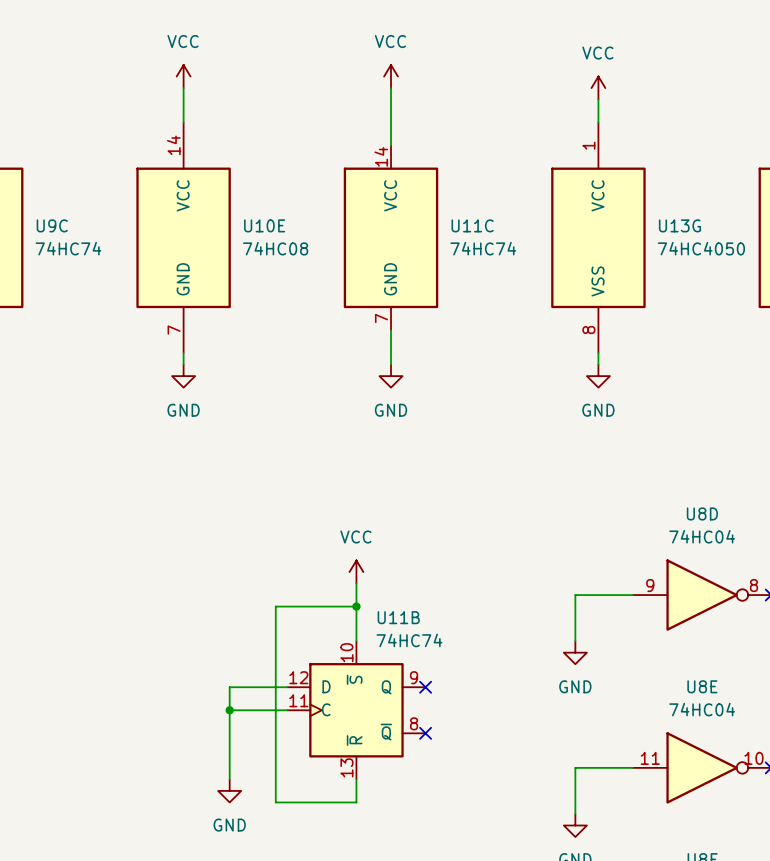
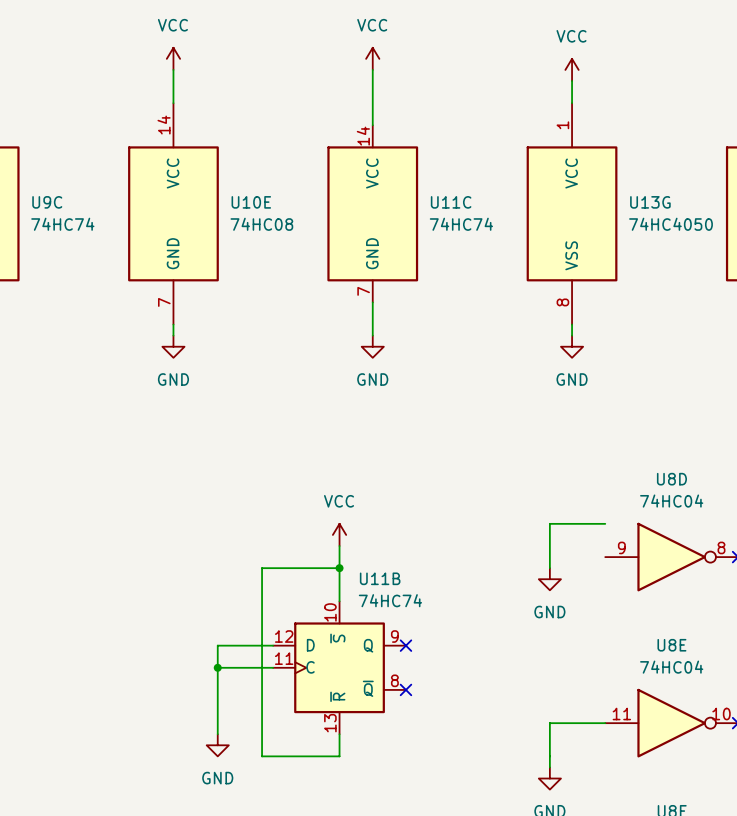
wire: (575, 595) (632, 595) -> (549, 557) (549, 523) (605, 523)
wire: (575, 606) (575, 641) -> none
power symbol position: GND (575, 652) -> GND (549, 579)

